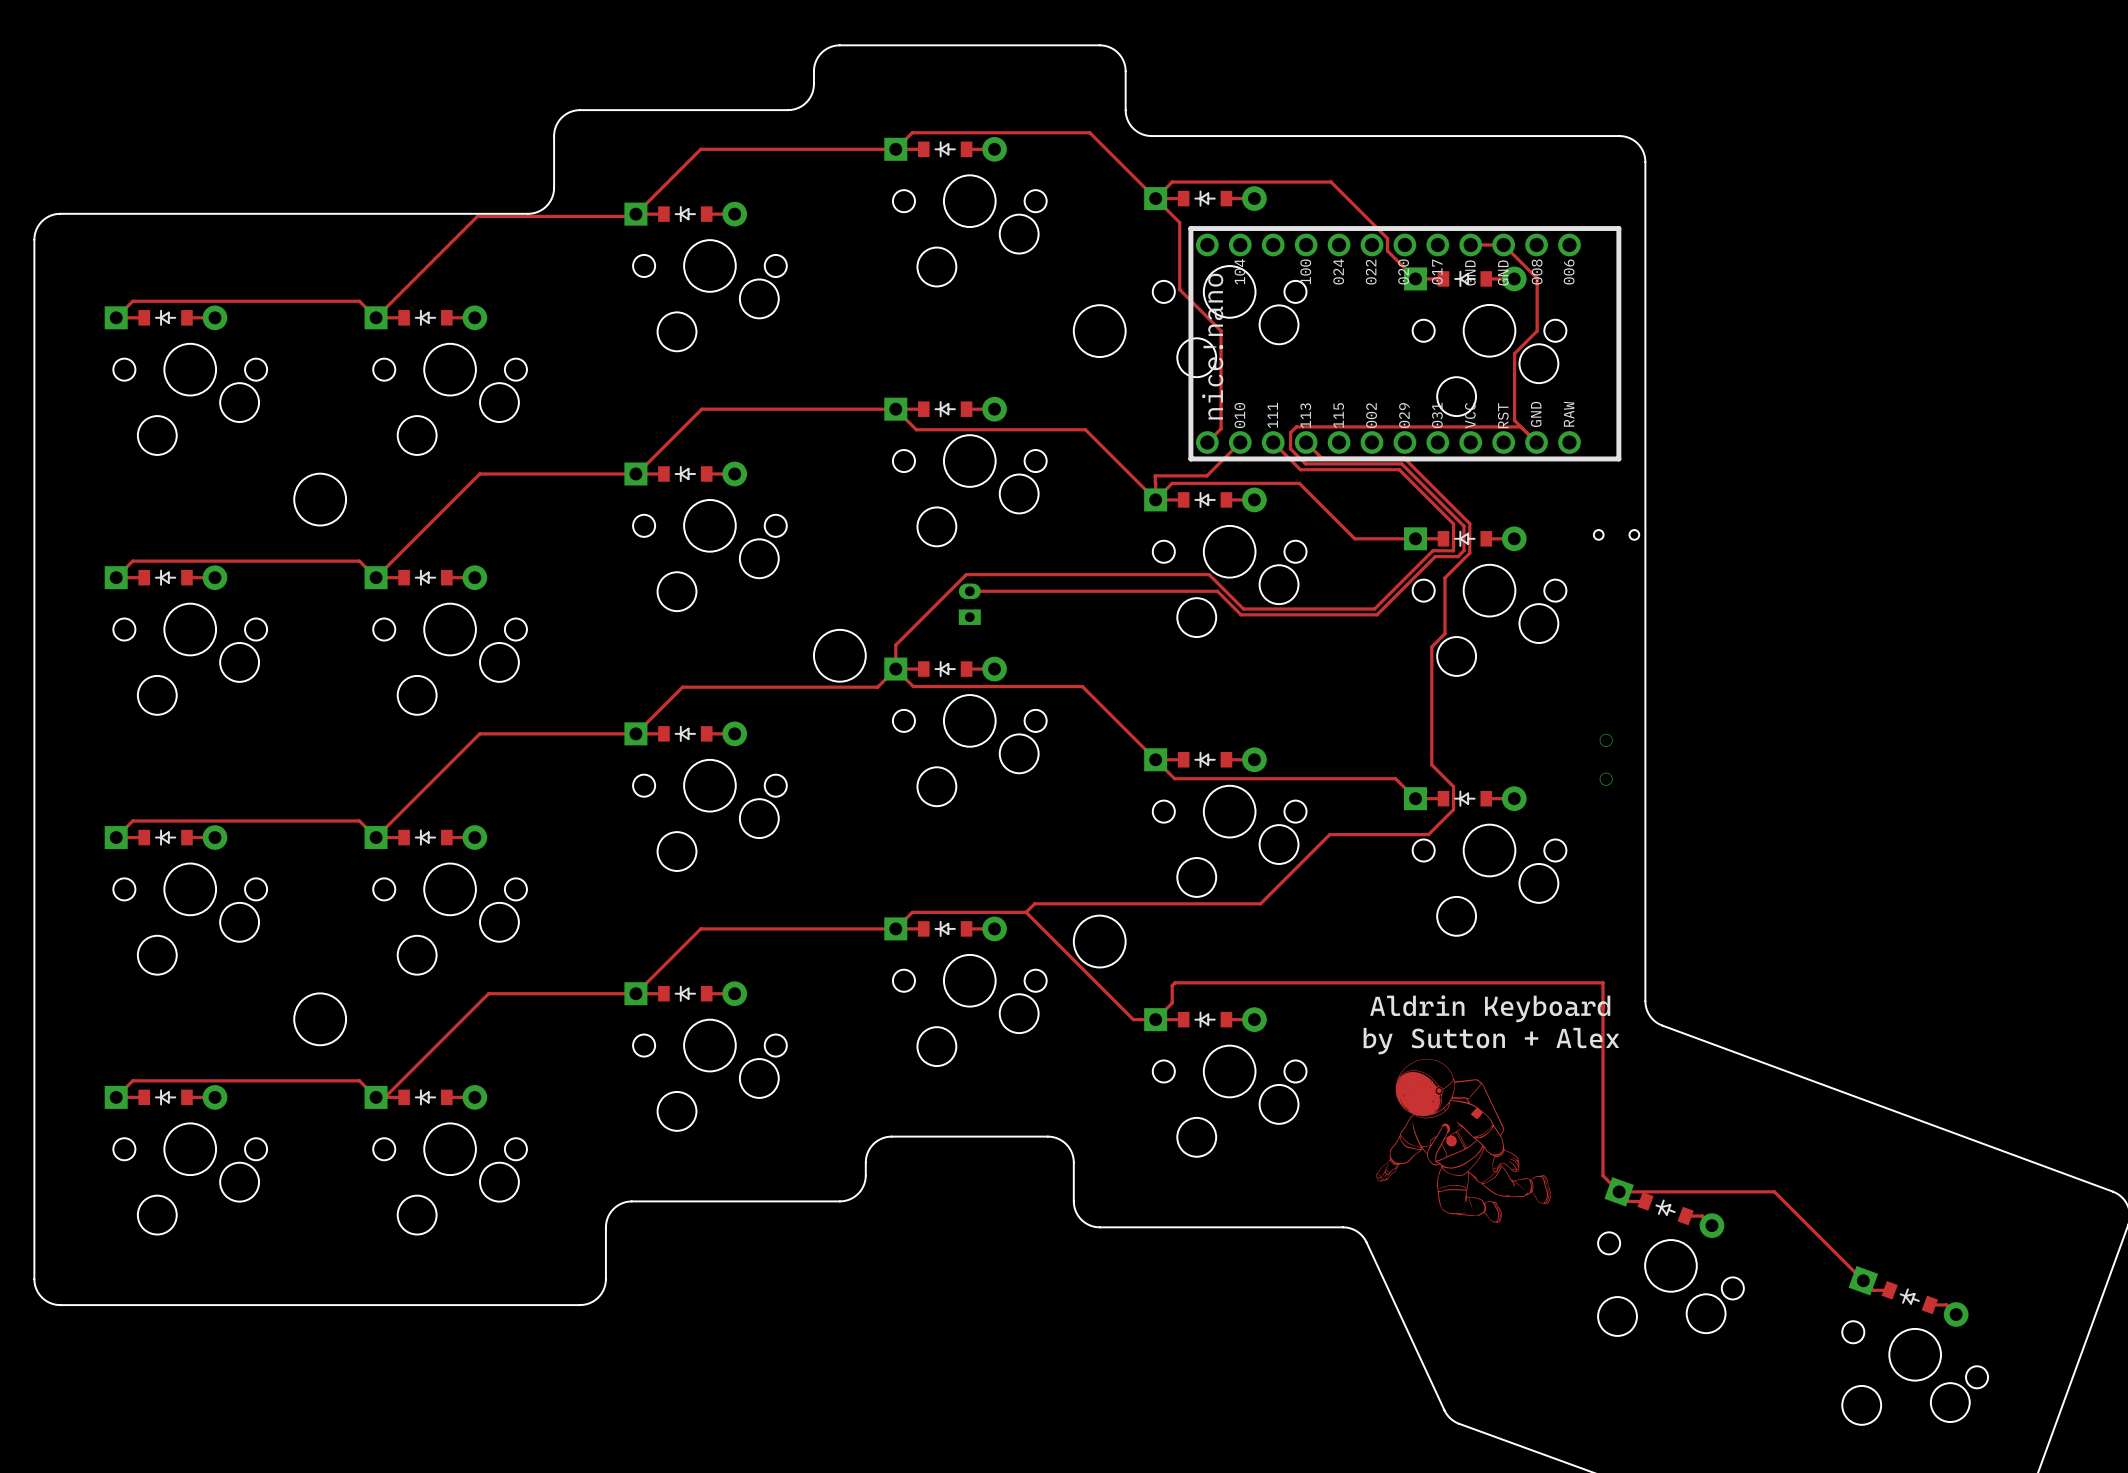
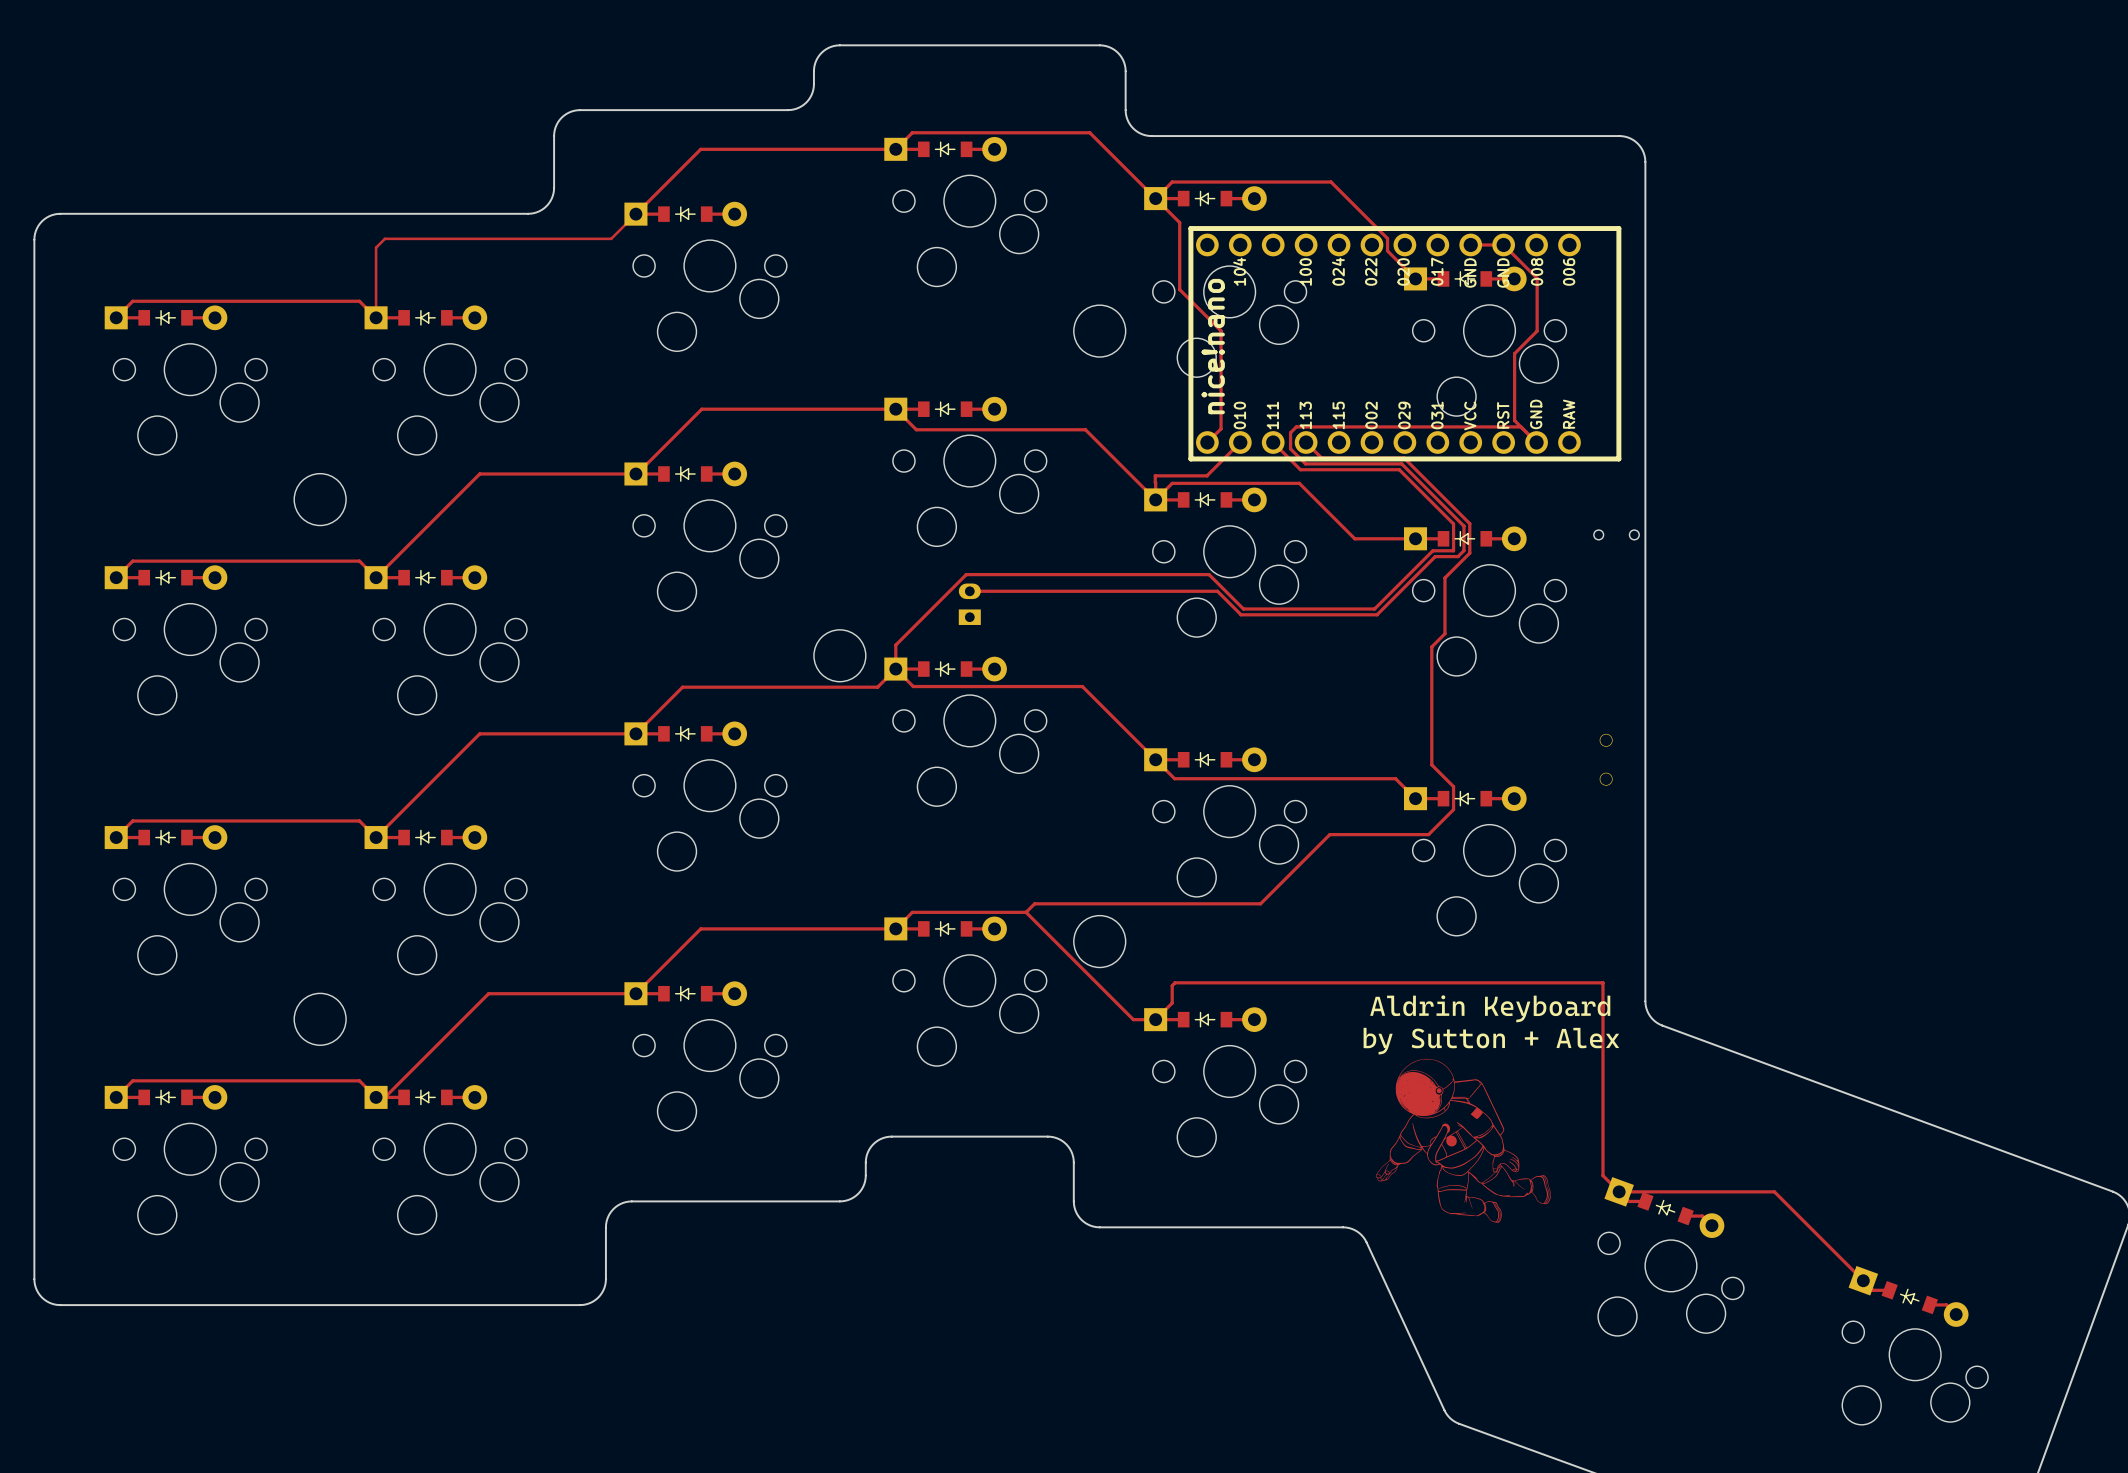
track: (633, 216) (477, 216) (376, 317) -> (635, 214) (611, 238) (384, 238) (376, 247) (376, 317)

